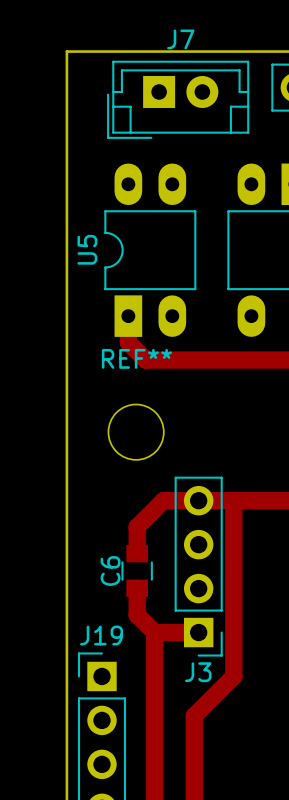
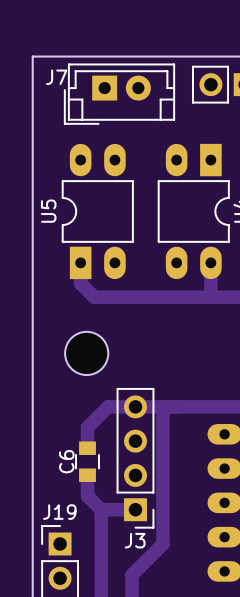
J7 name position: J7 (180, 39) -> J7 (56, 77)
REF** name: REF** (136, 358) -> none

